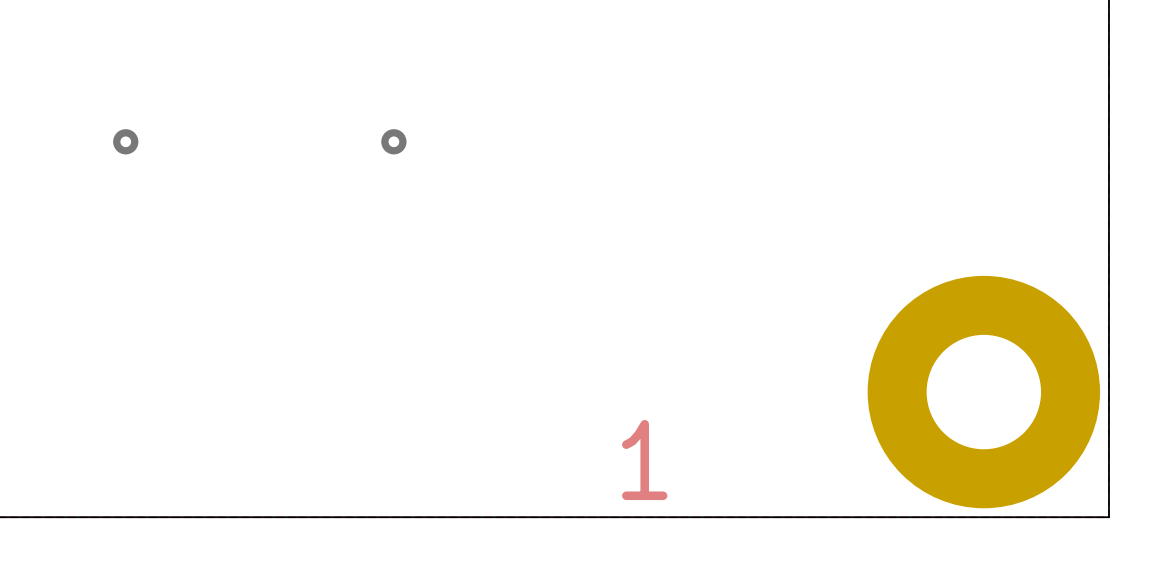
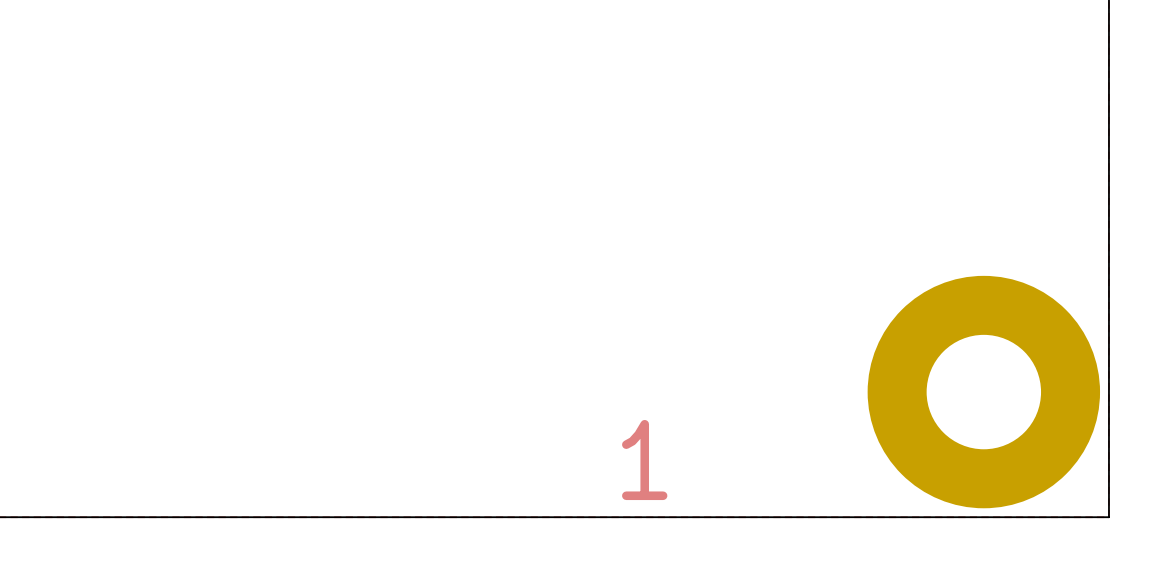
via: (125, 141) -> none
via: (393, 141) -> none

